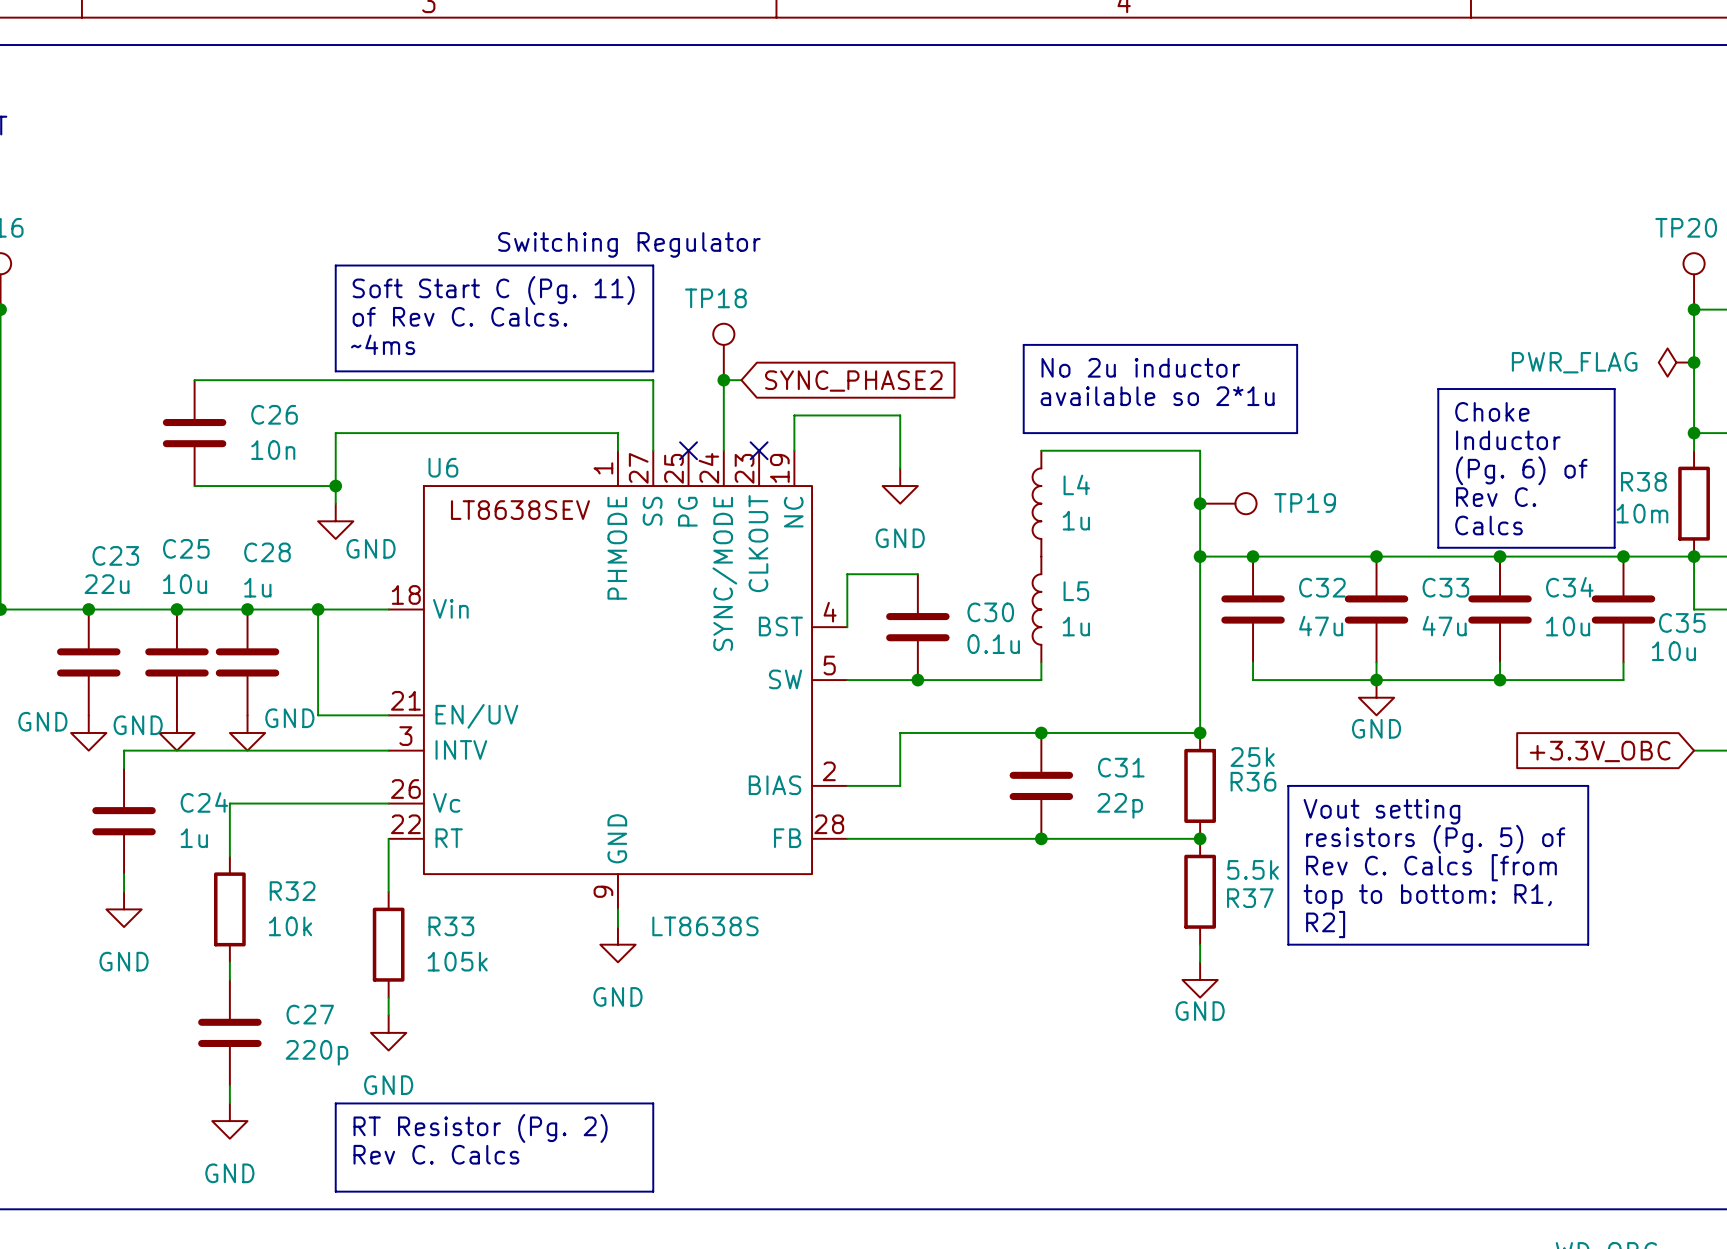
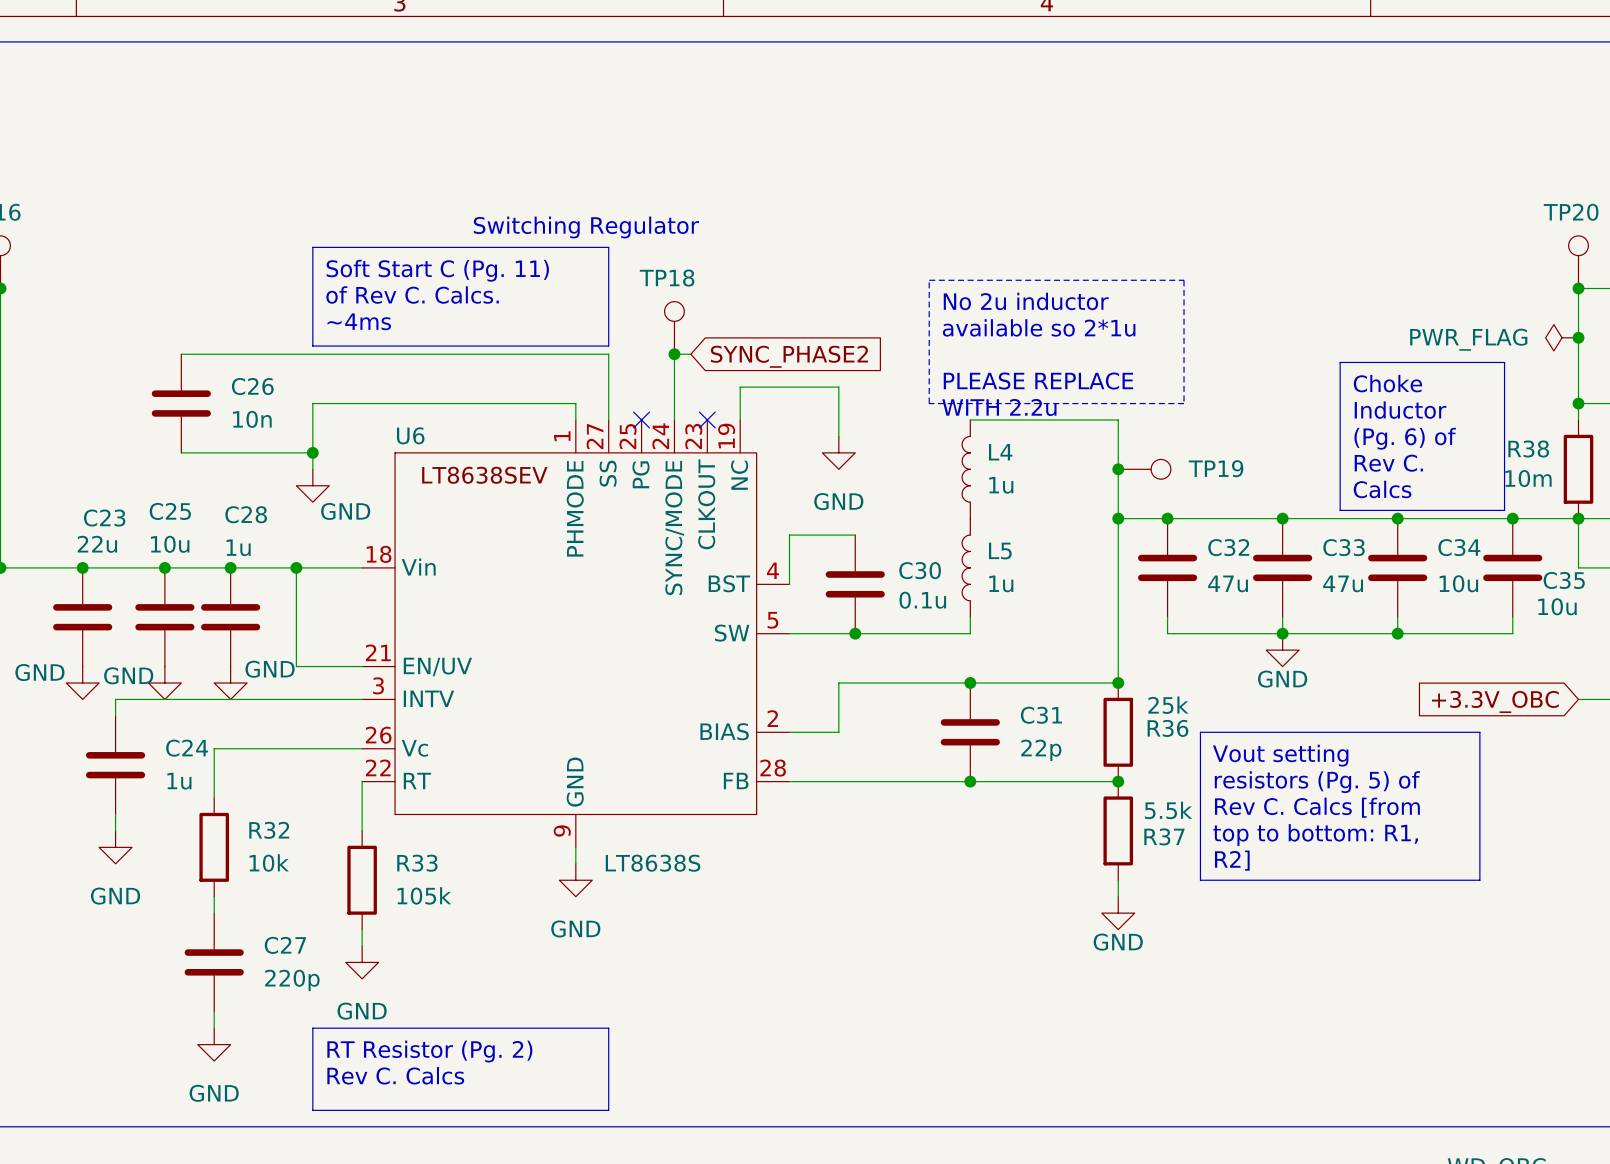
line: (1023, 344) (1297, 344) (1297, 433) (1023, 433) (1023, 344) -> (929, 280) (929, 403) (1184, 403) (1184, 280) (929, 280)
text position: No 2u inductor (1140, 367) -> No 2u inductor (1026, 301)
text position: available so 2*1u (1157, 396) -> available so 2*1u (1039, 327)
text: none -> PLEASE REPLACE (1038, 381)
text: none -> WITH 2.2u (999, 407)

